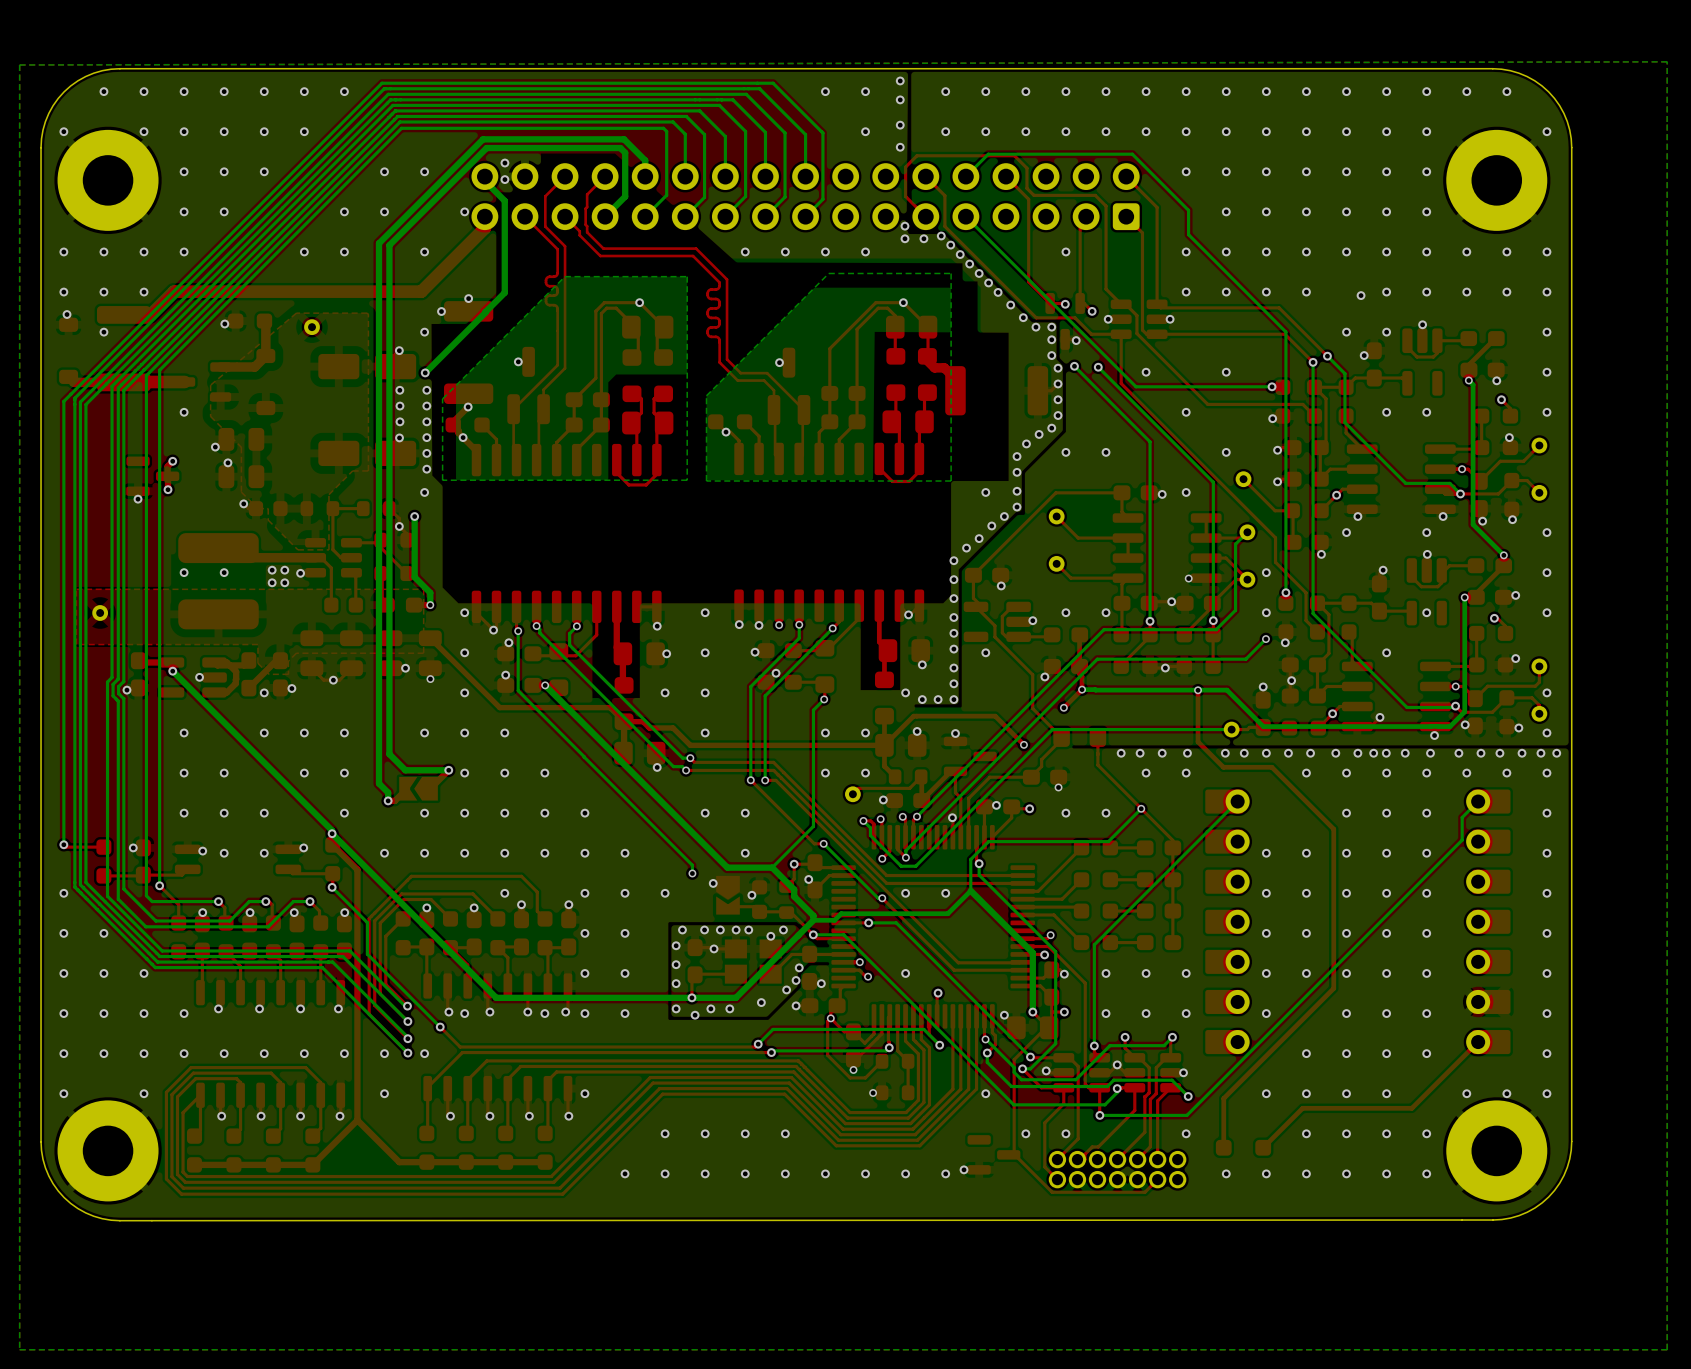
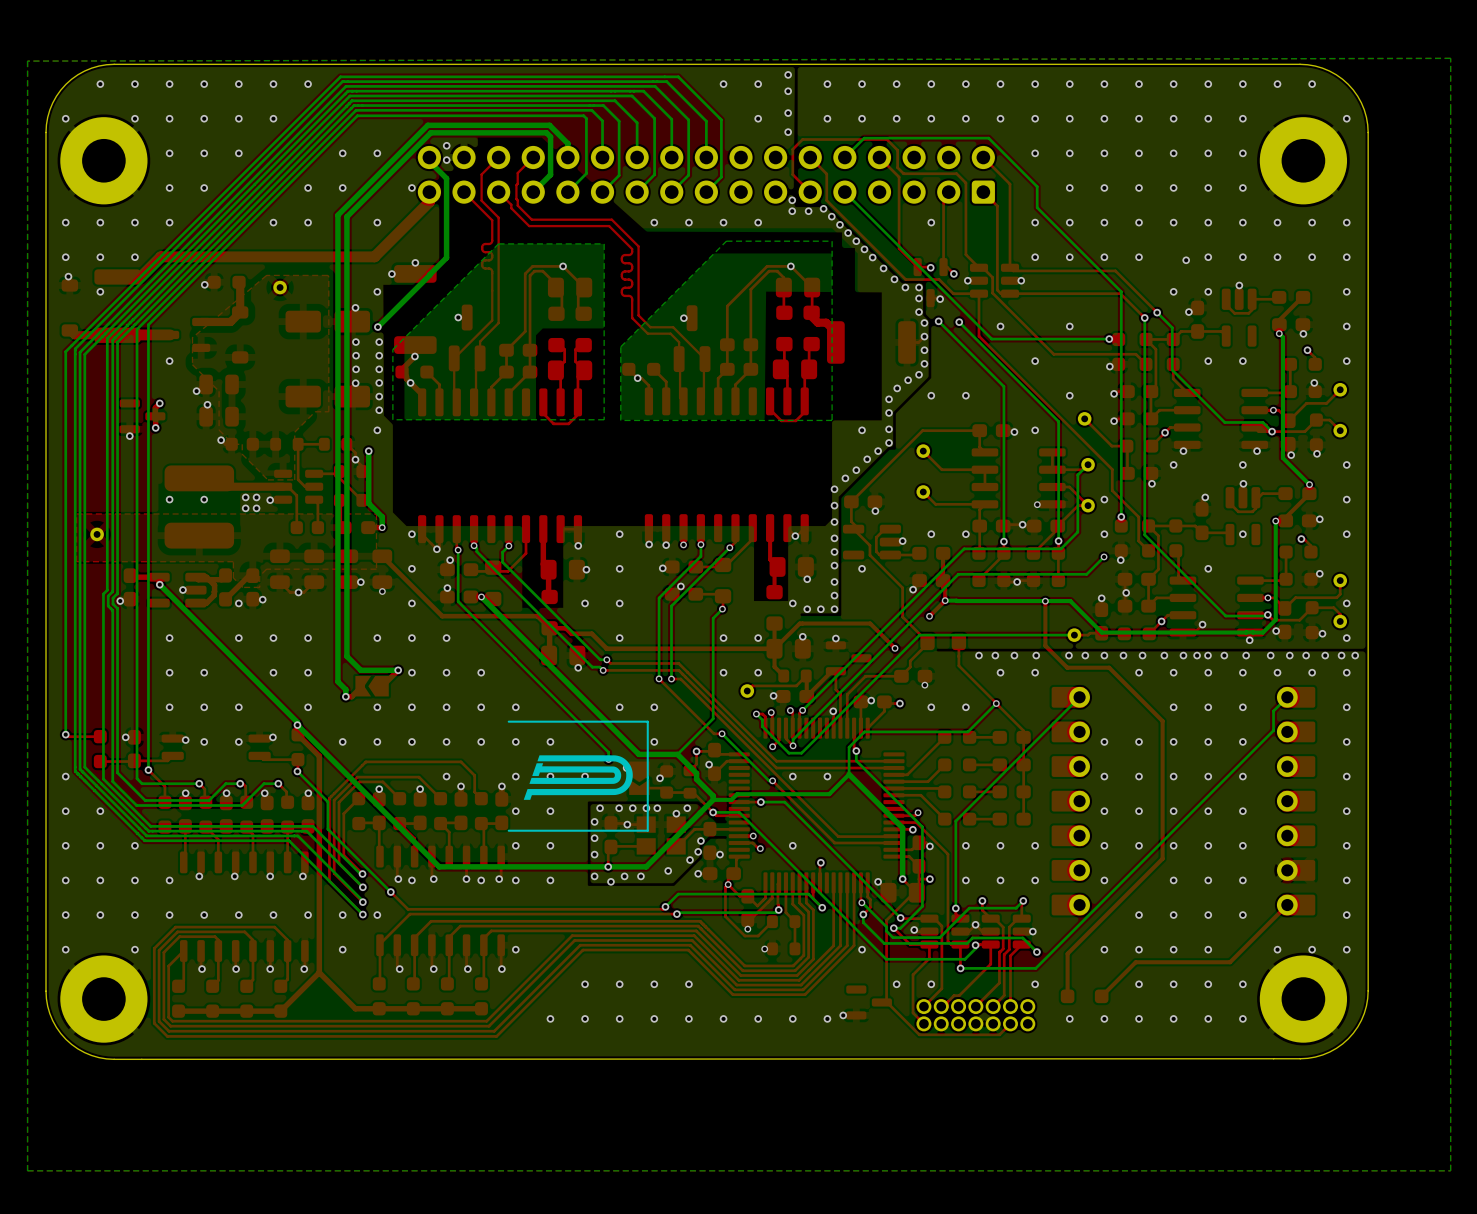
line: none -> (508, 721) (647, 721) (647, 830) (508, 830)
drawing: none -> [523, 755, 633, 800]

